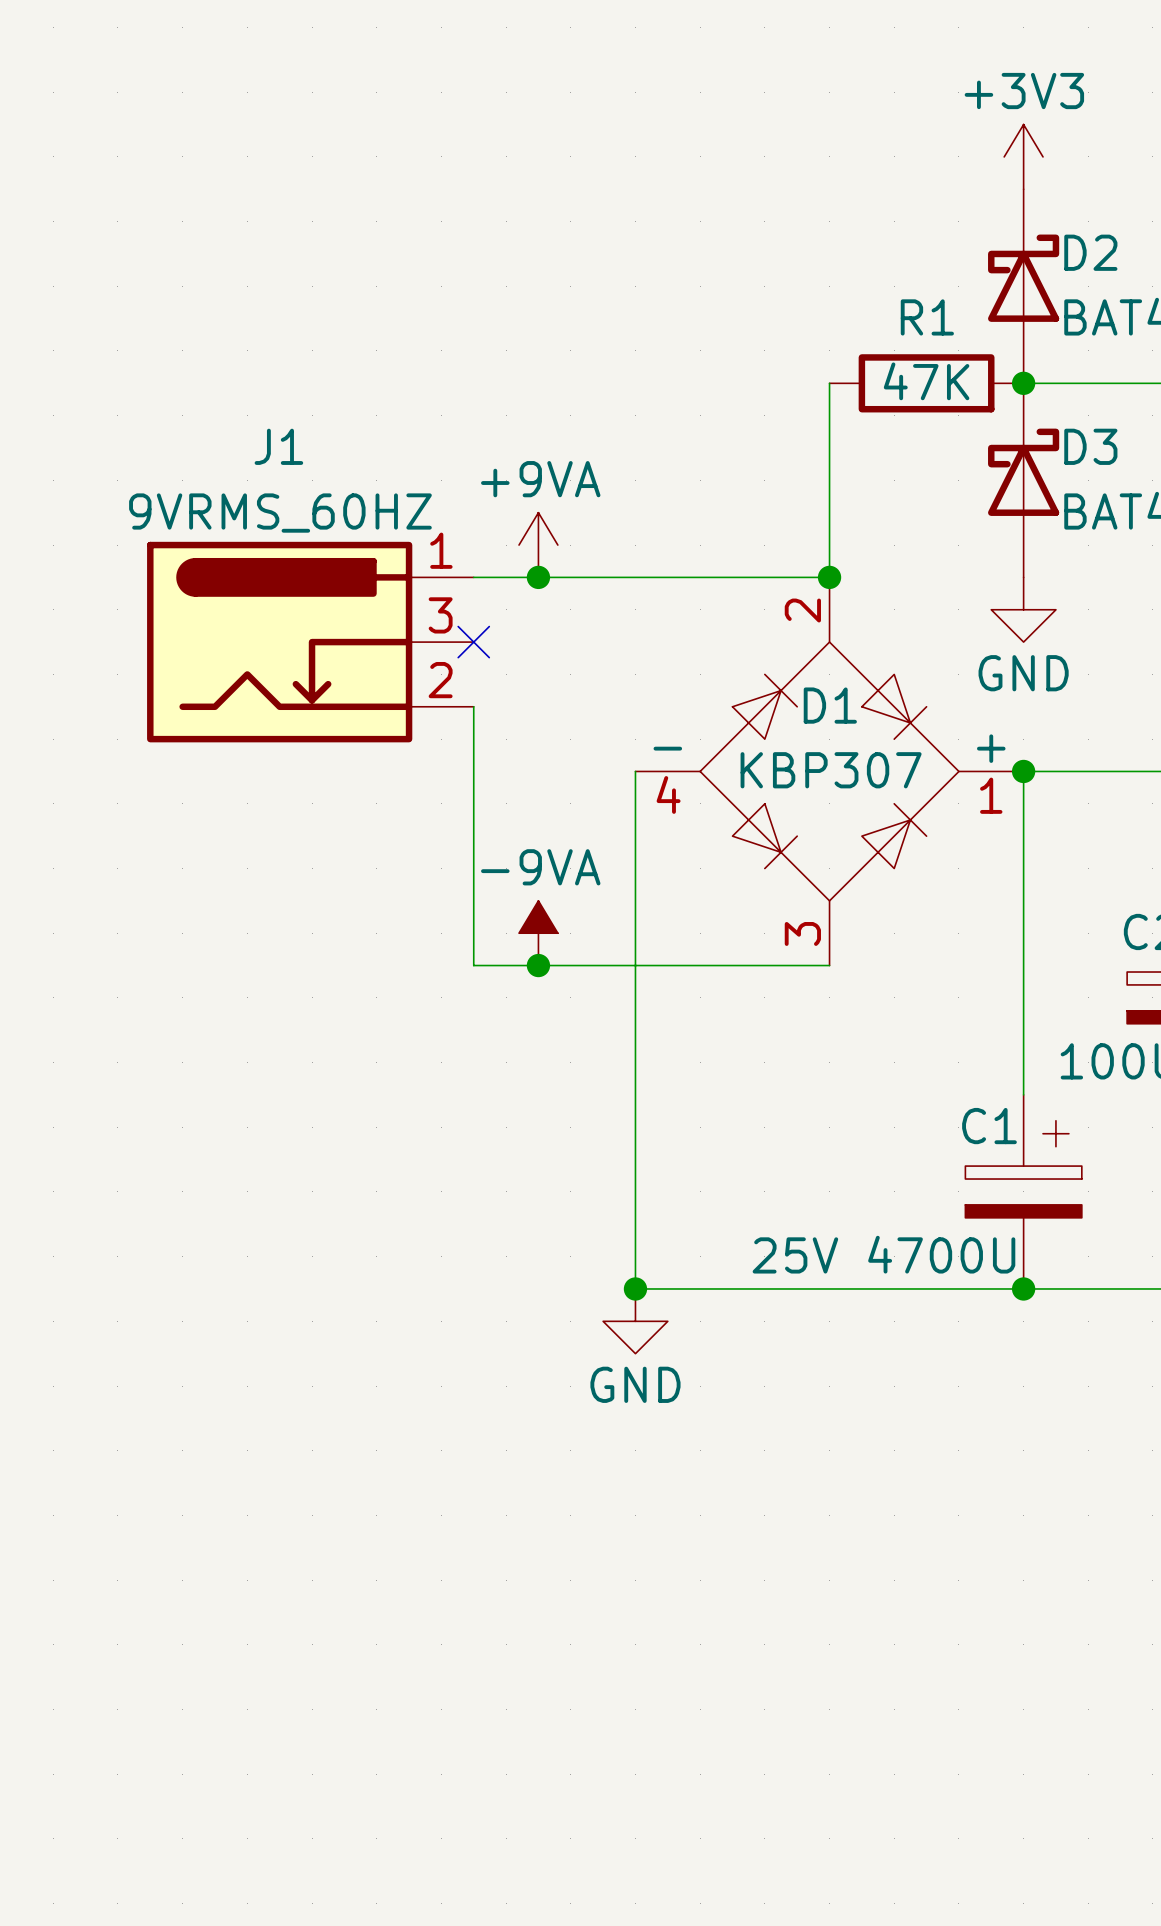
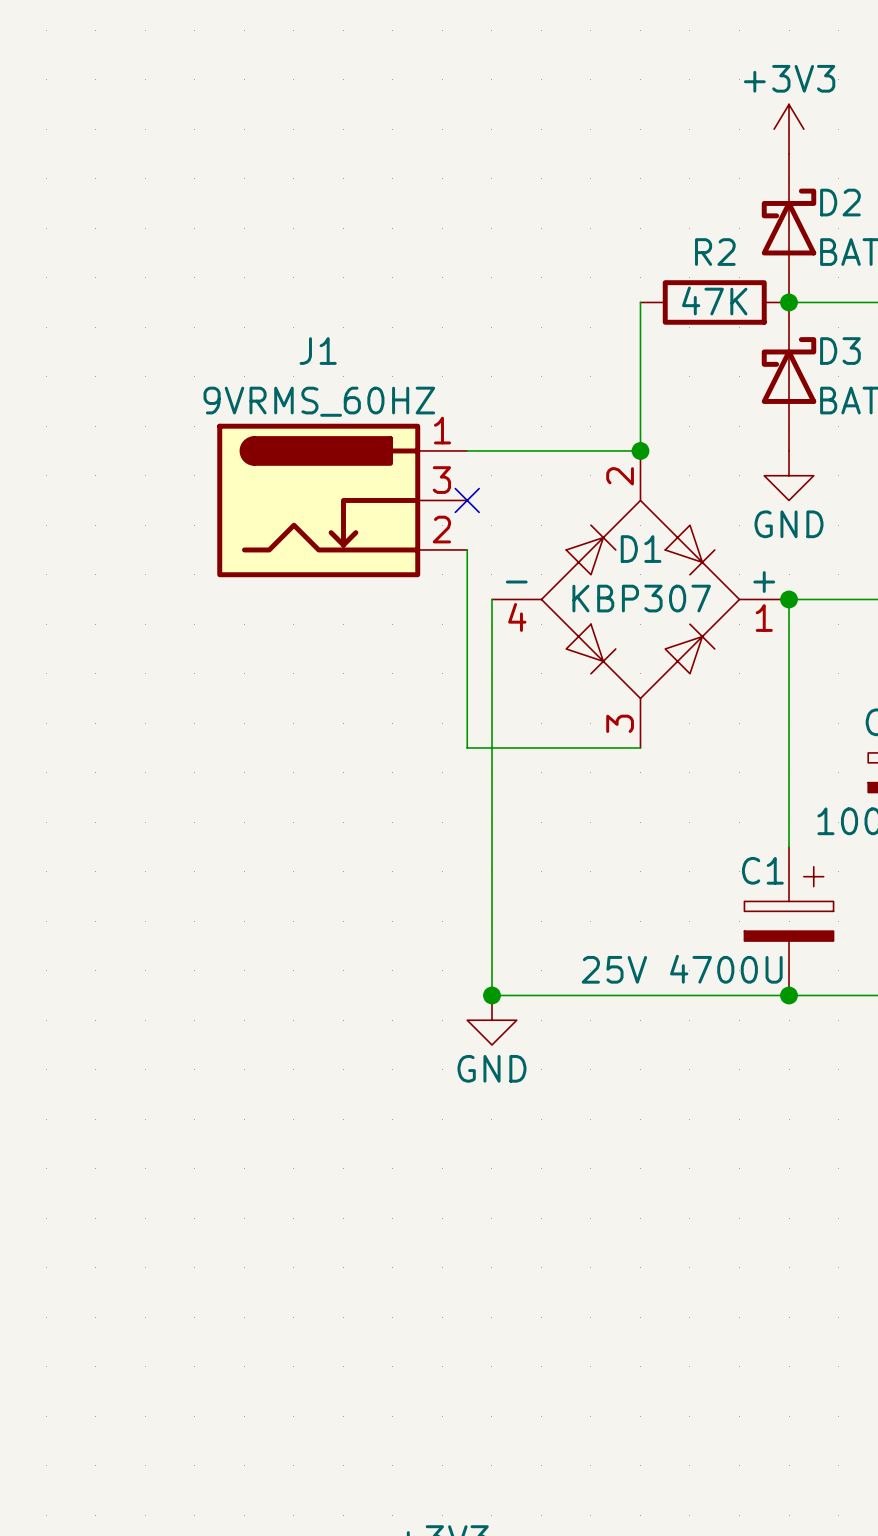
R1 name: R1 (927, 317) -> R2 (715, 252)
power symbol: +9VA (538, 545) -> none
junction: (538, 577) -> none
J1 position: (310, 642) -> (342, 500)
no-connect mark position: (473, 642) -> (467, 500)
wire: (473, 706) (473, 965) (603, 965) -> (467, 549) (467, 747)
power symbol: -9VA (538, 933) -> none
junction: (538, 965) -> none

